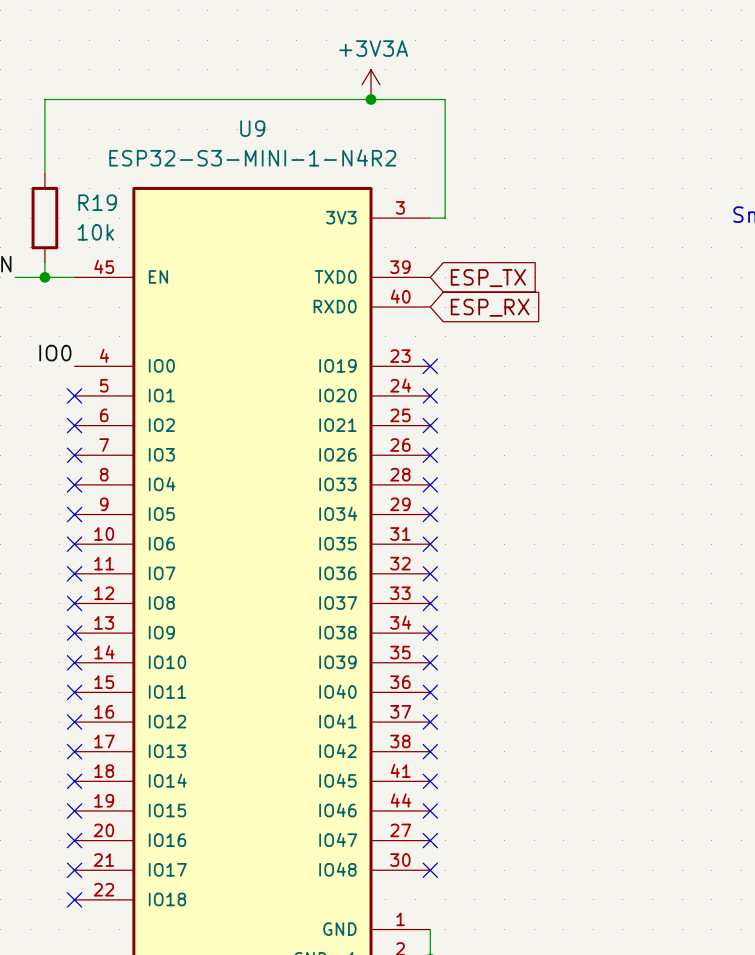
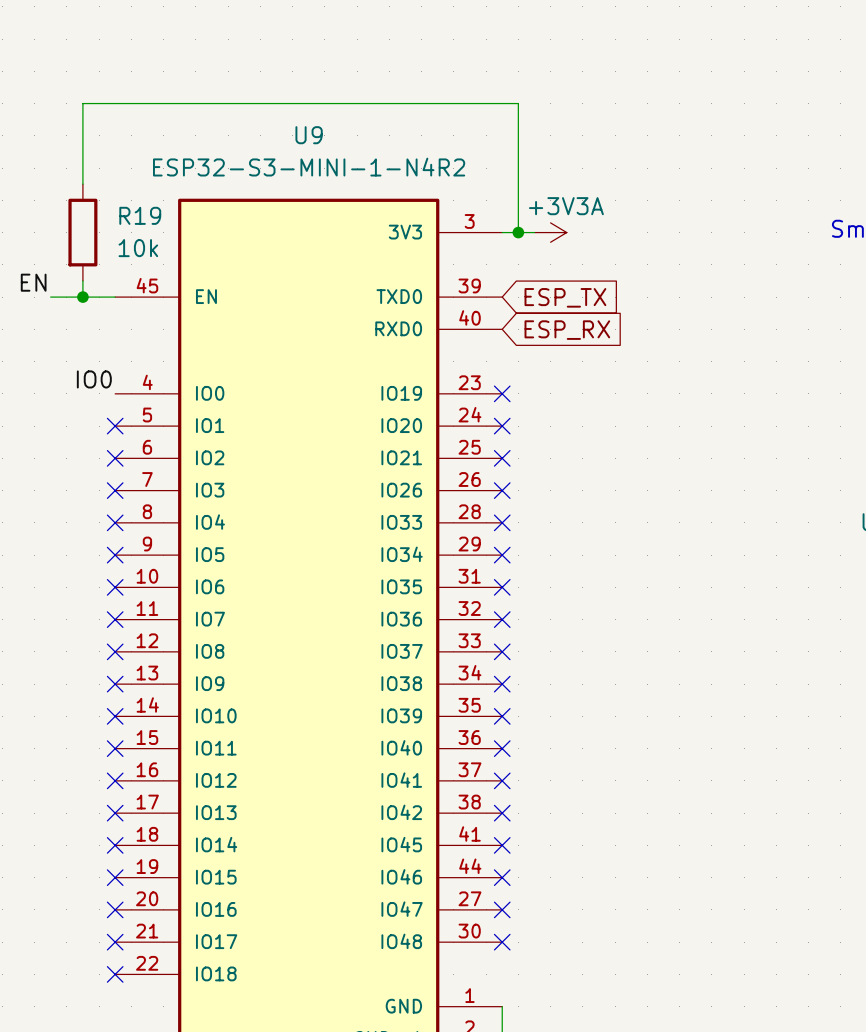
power symbol rotation: 0° (371, 84) -> 90° clockwise (550, 232)
power symbol position: +3V3A (371, 84) -> +3V3A (550, 232)
junction: (371, 99) -> none
wire: none -> (518, 232) (534, 232)
junction: none -> (518, 232)

